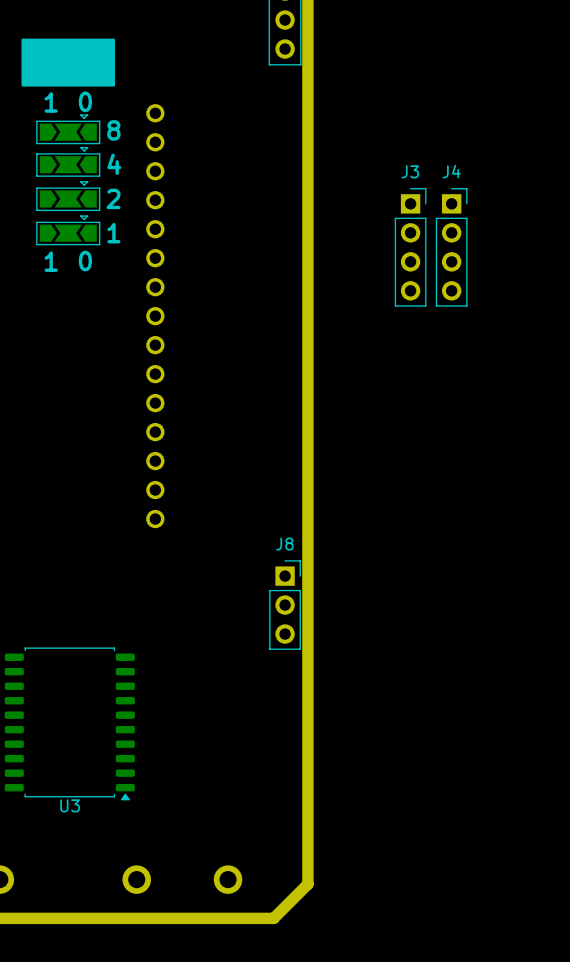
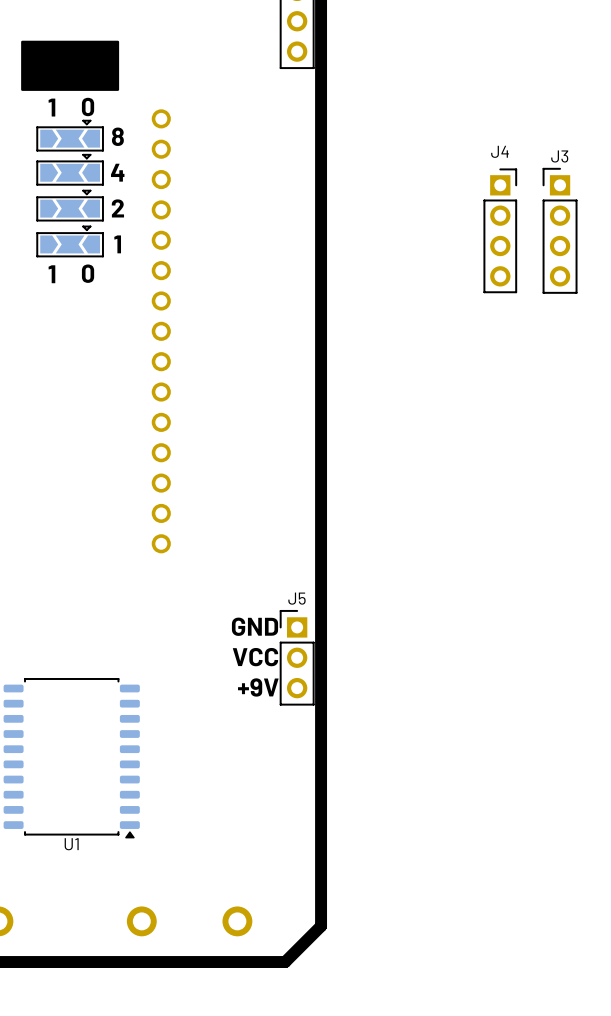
J3 footprint: [394, 188, 427, 307] -> [542, 168, 578, 294]
J4 position: (451, 247) -> (500, 230)
text: none -> GND (254, 626)
J8: (285, 605) -> none
text: none -> VCC (255, 657)
J5: none -> (297, 657)
text: none -> +9V (258, 687)
U3 name: U3 (70, 805) -> U1 (71, 844)

